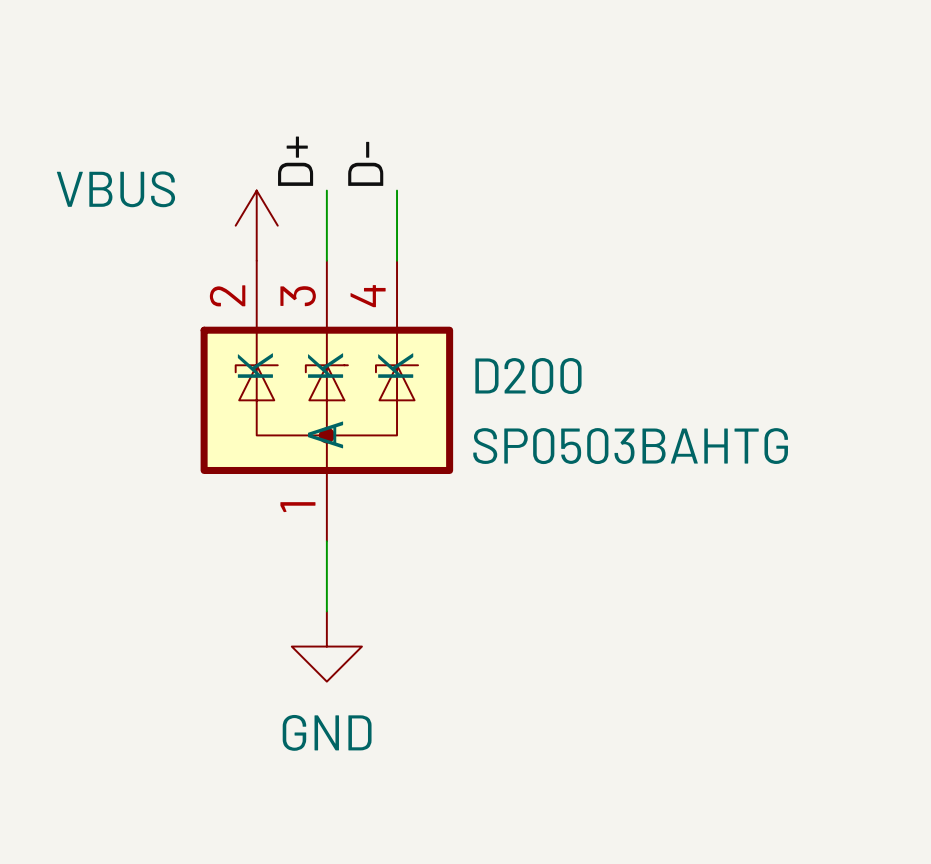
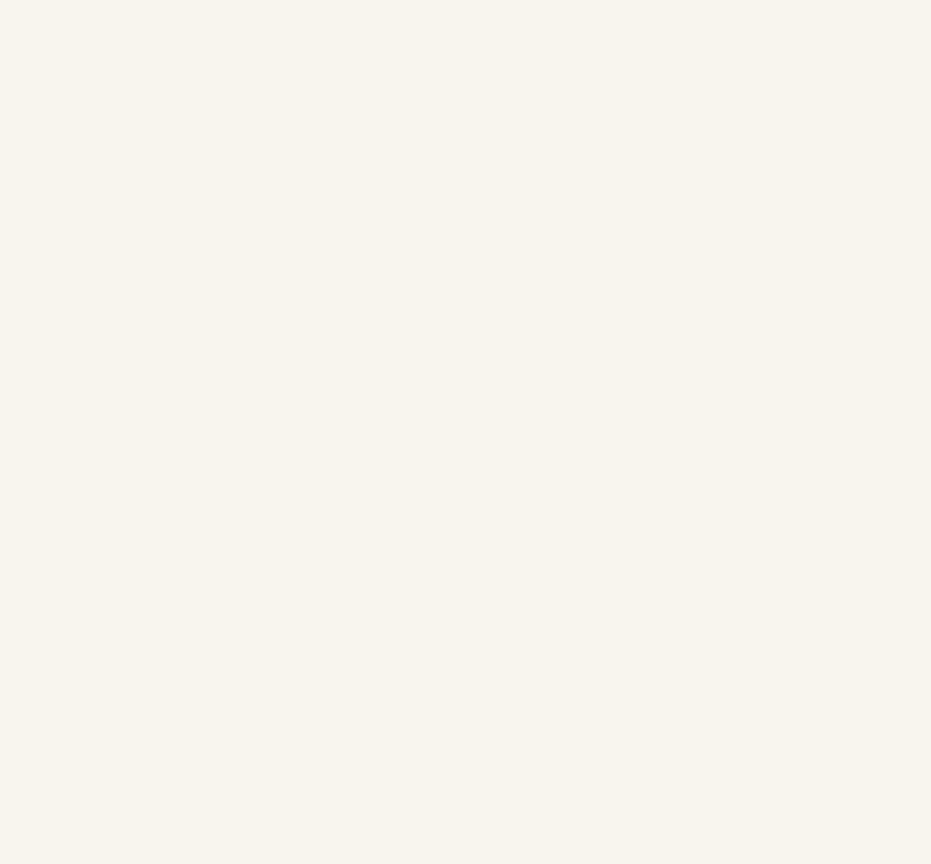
label: D+ (295, 161) -> none
label: D- (365, 163) -> none
wire: (326, 190) (326, 260) -> none
wire: (397, 190) (397, 260) -> none
power symbol: VBUS (256, 225) -> none
D200: SP0503BAHTG (326, 401) -> none
wire: (326, 541) (326, 611) -> none
power symbol: GND (326, 646) -> none

